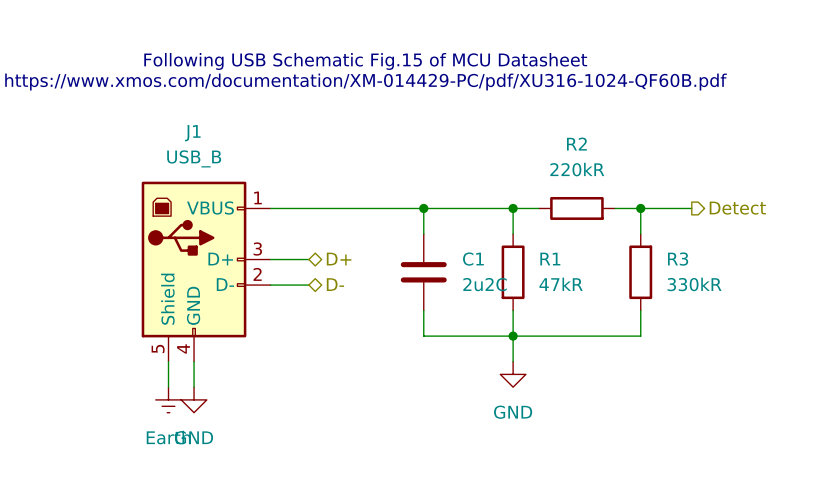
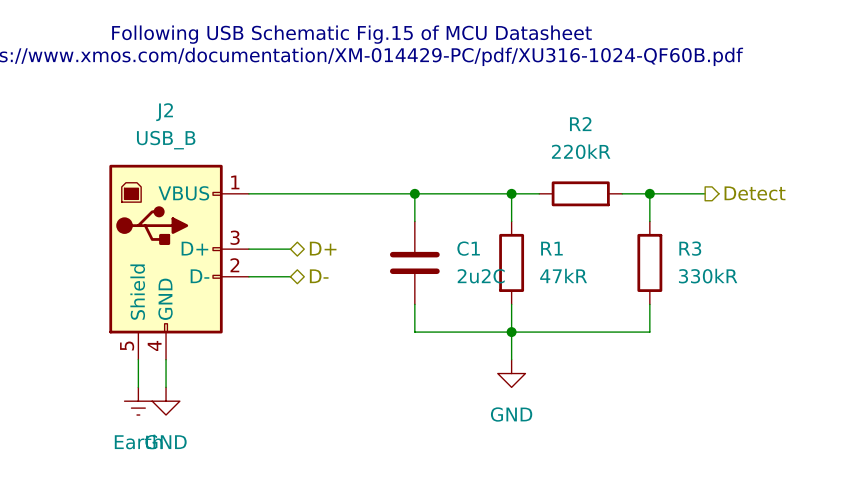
J1 name: J1 (192, 133) -> J2 (164, 112)

